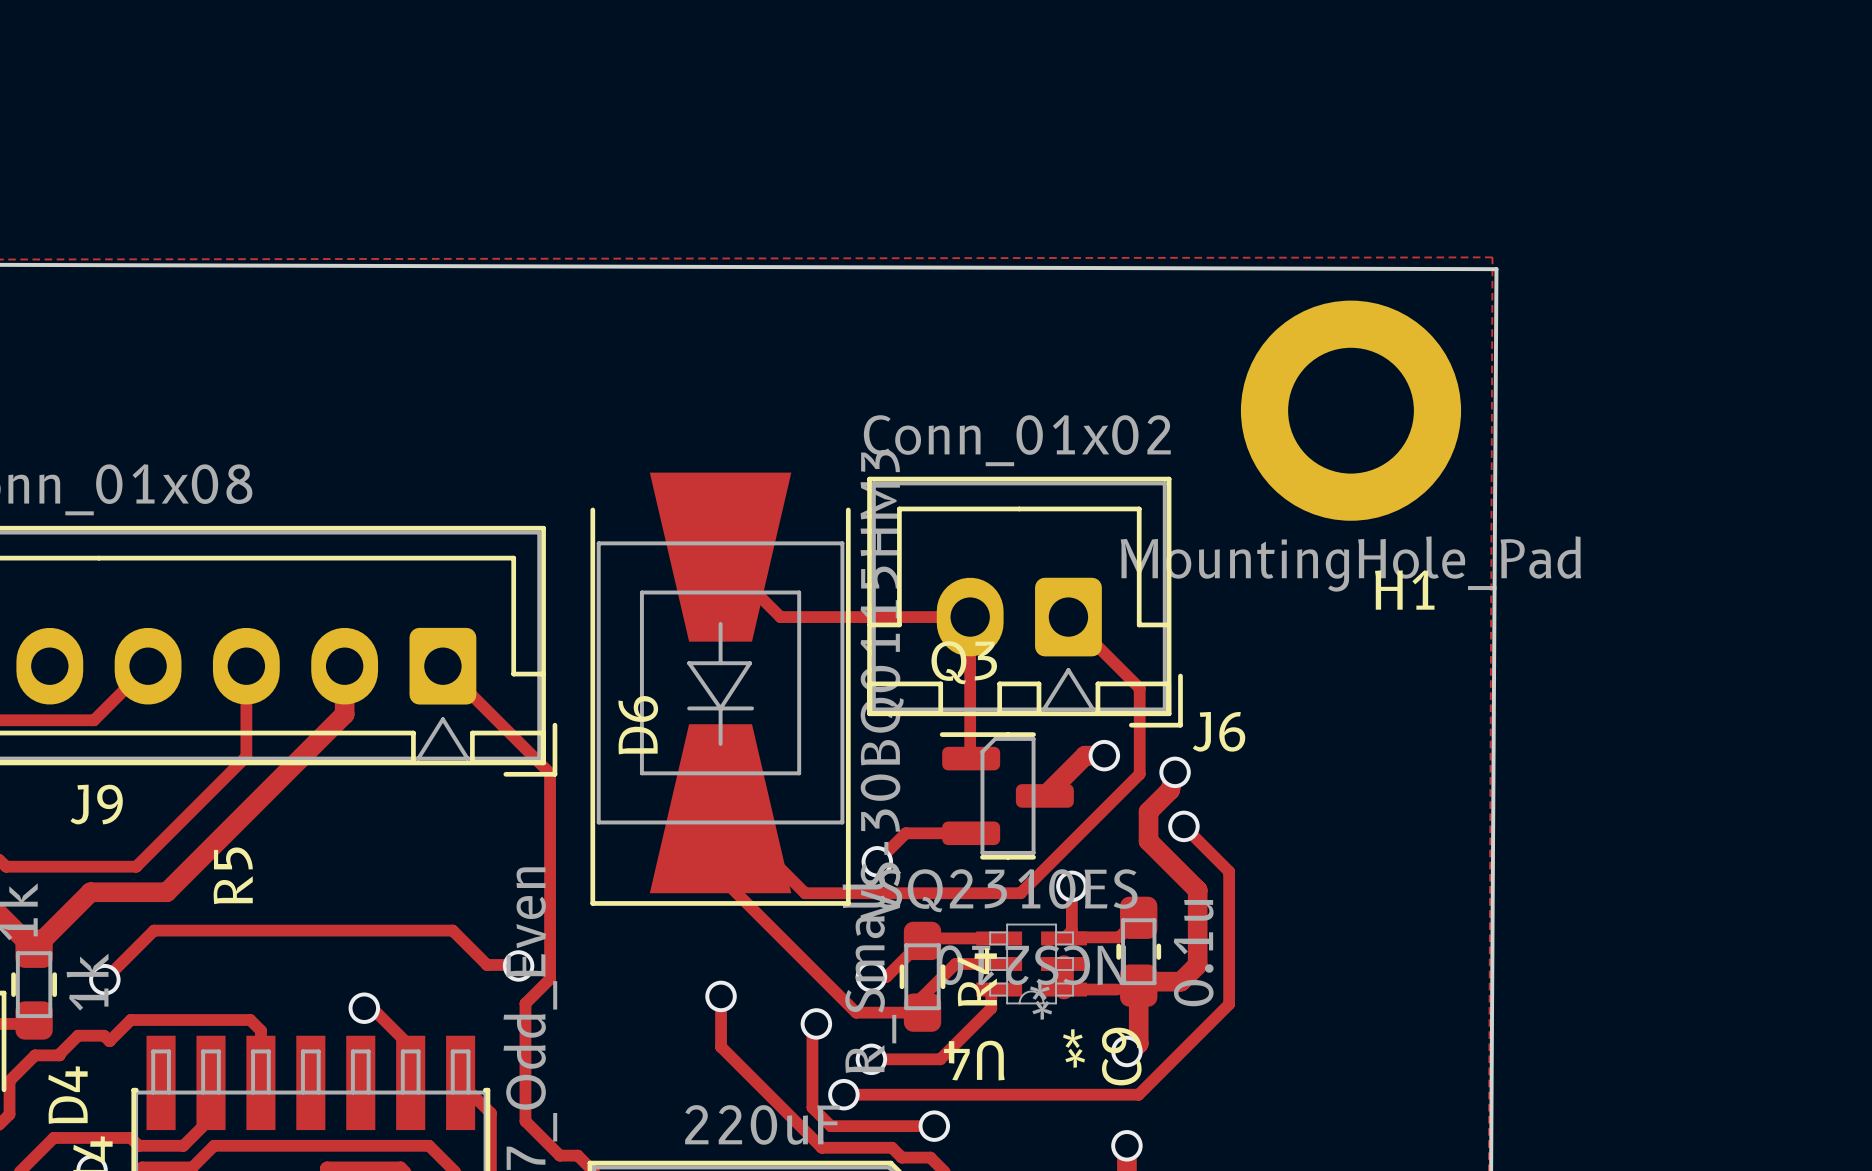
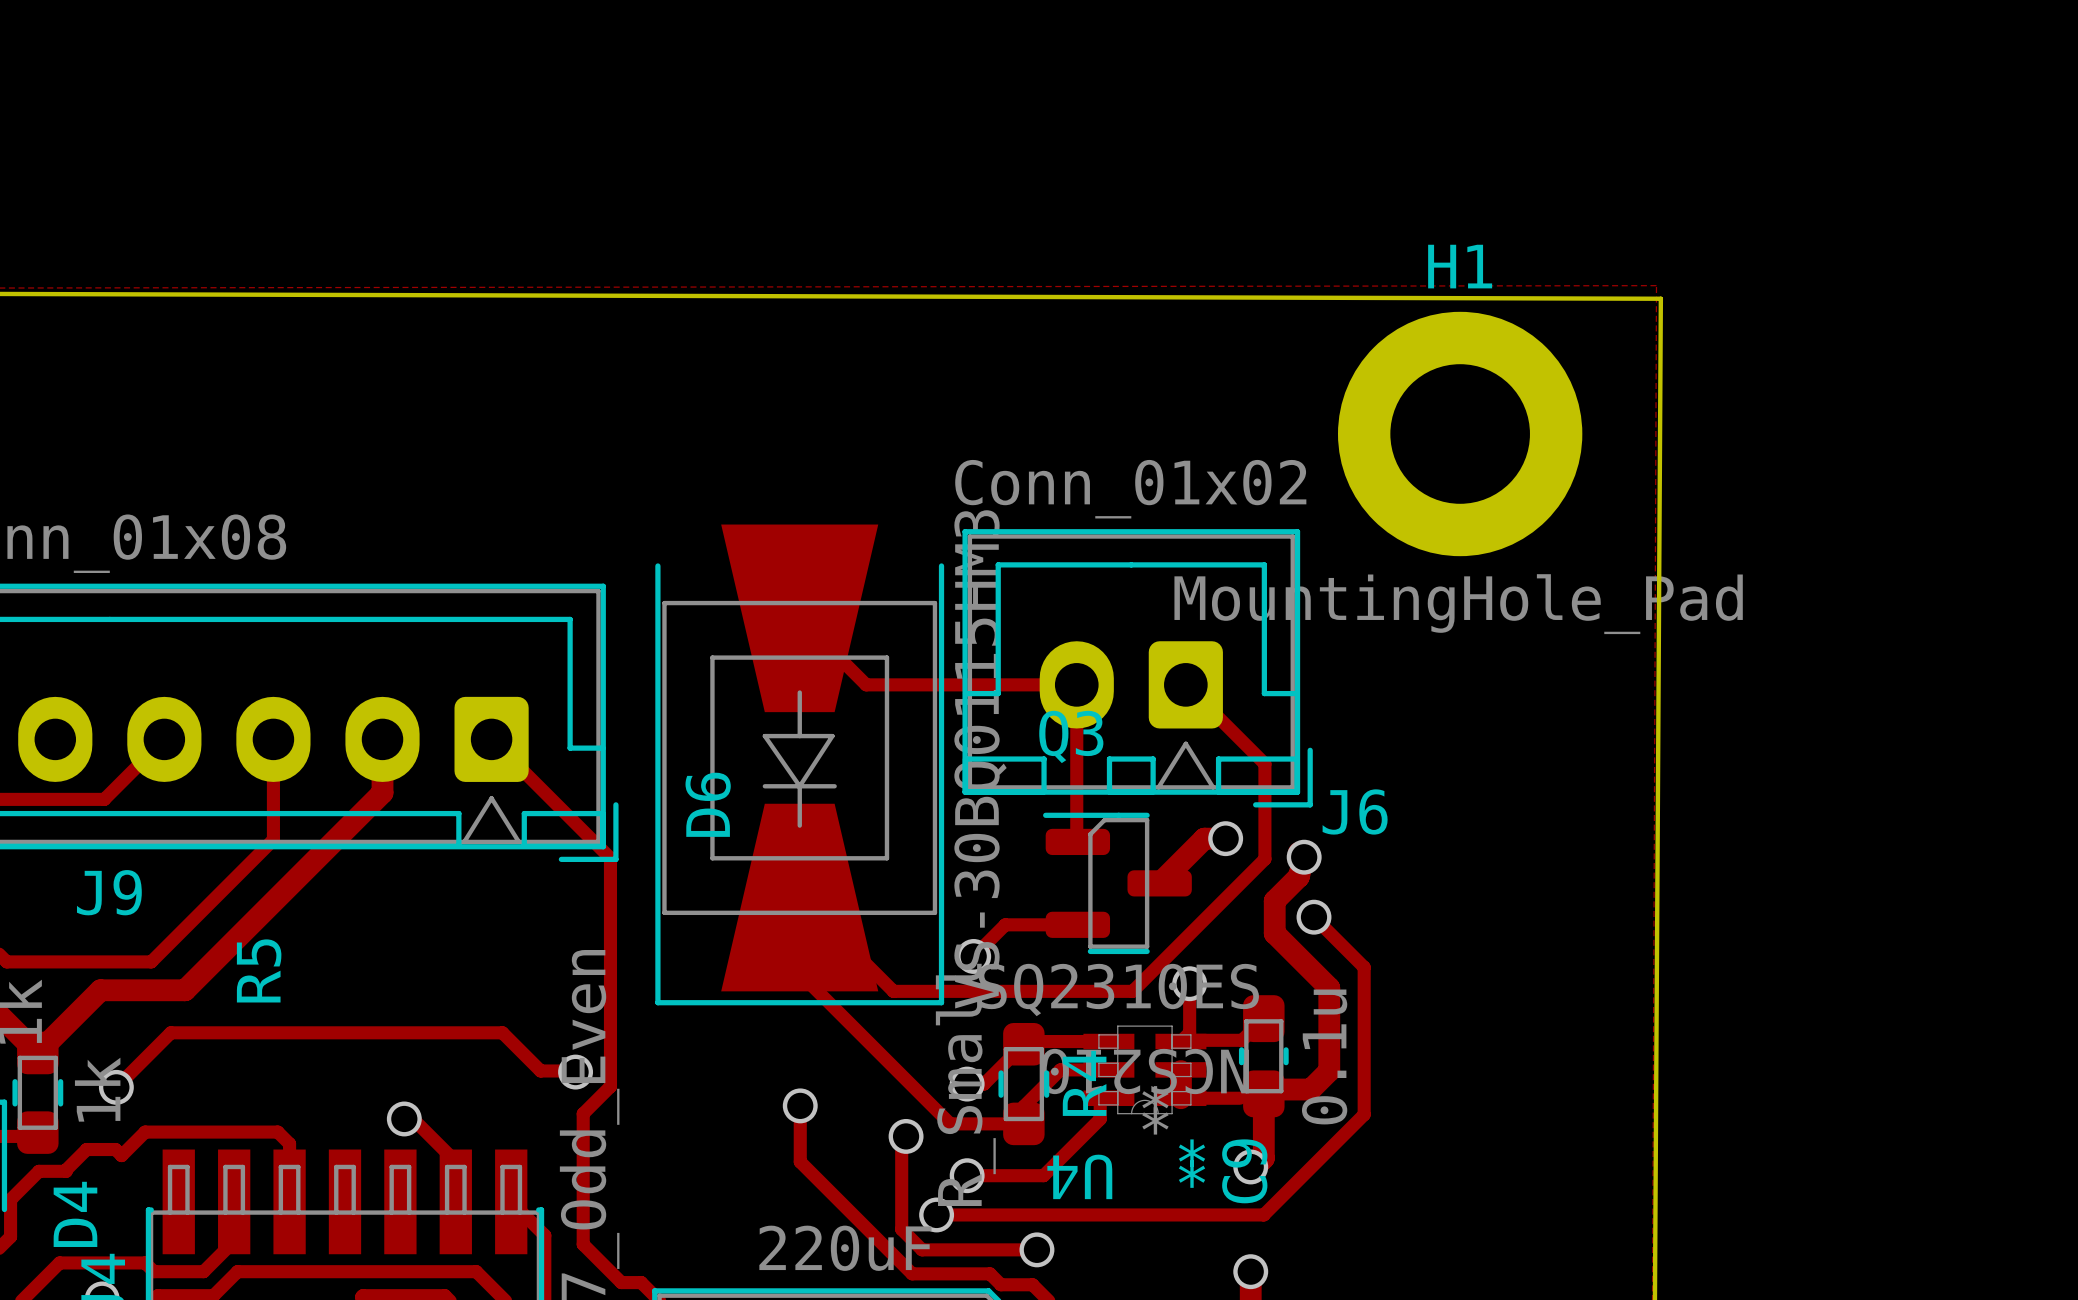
H1 position: (1351, 410) -> (1460, 433)
H1 name position: H1 (1404, 590) -> H1 (1460, 266)

